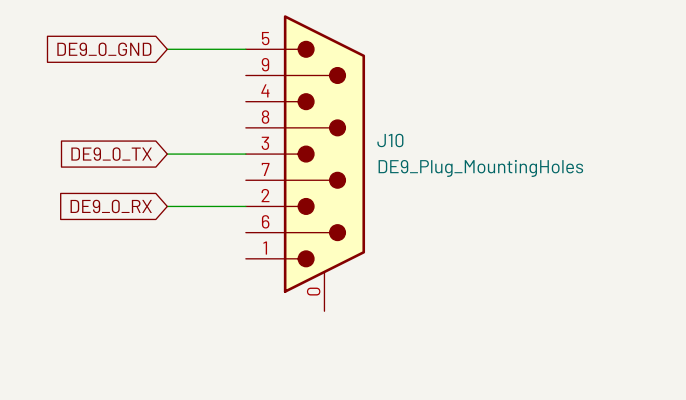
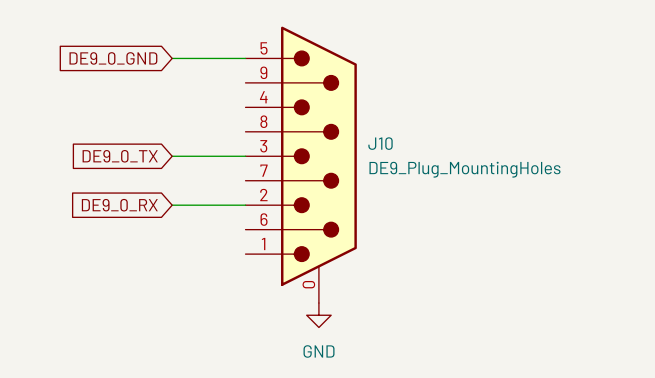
power symbol: none -> GND (318, 315)

